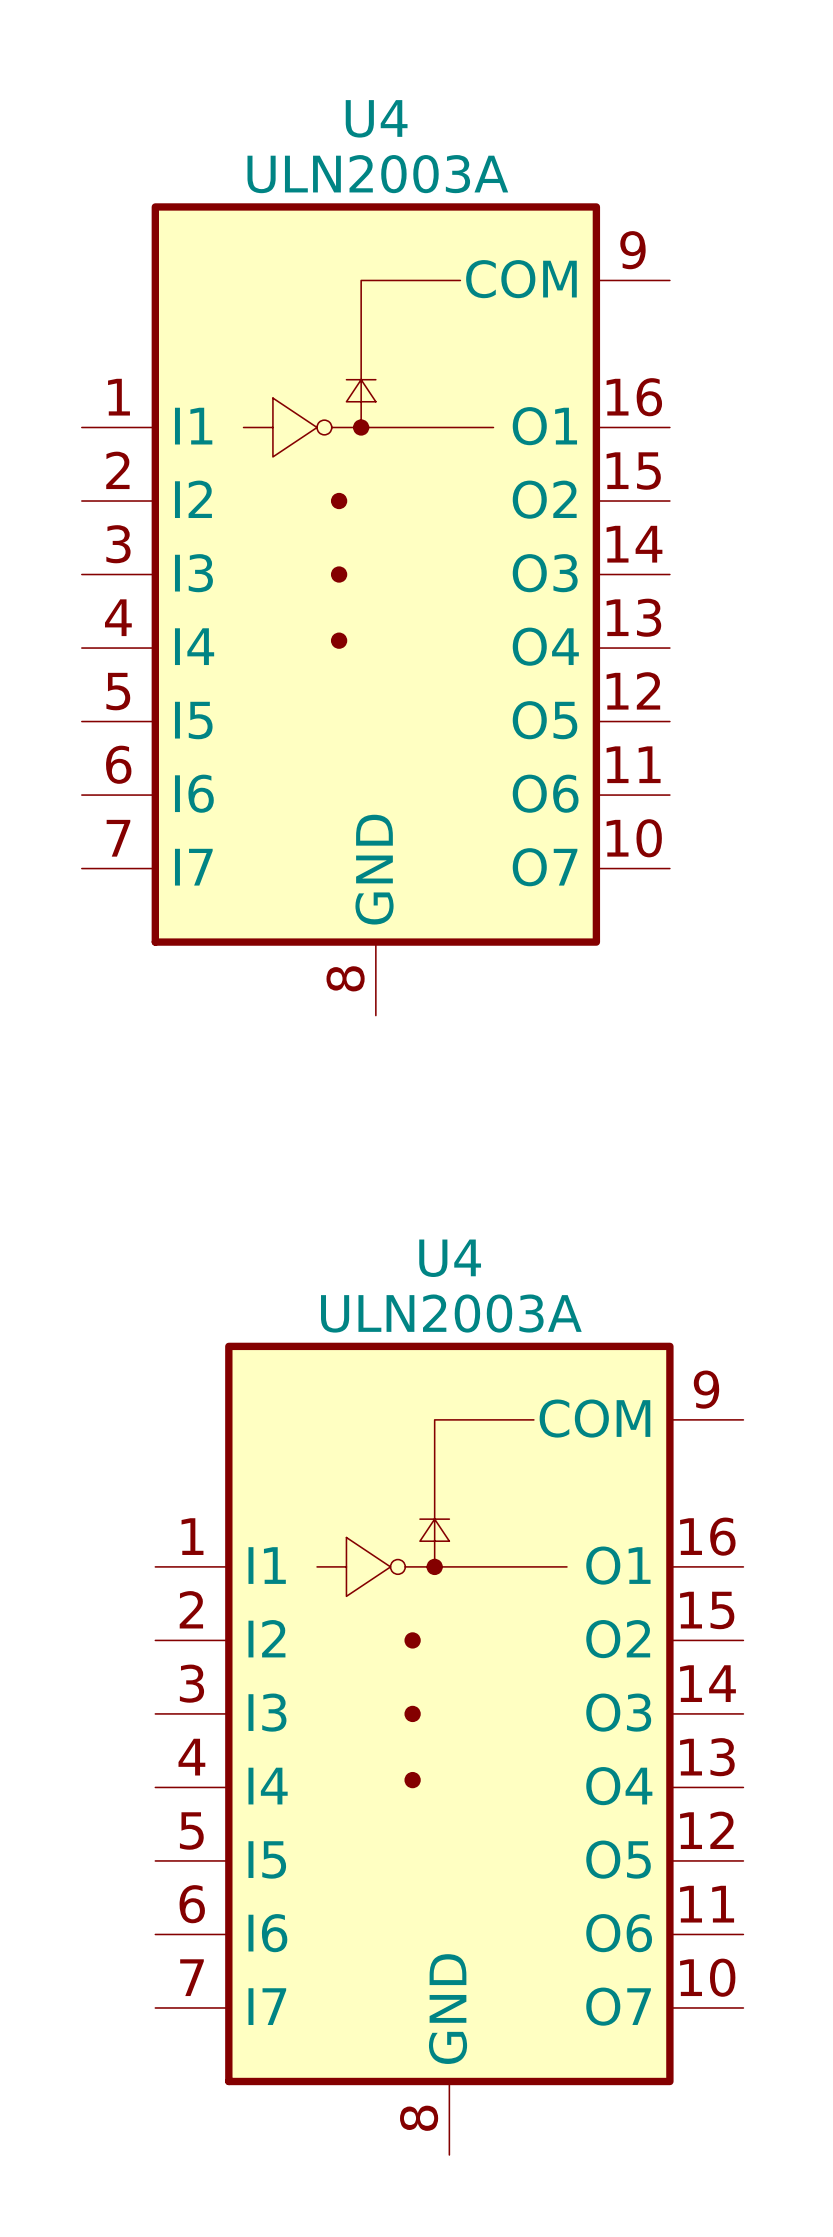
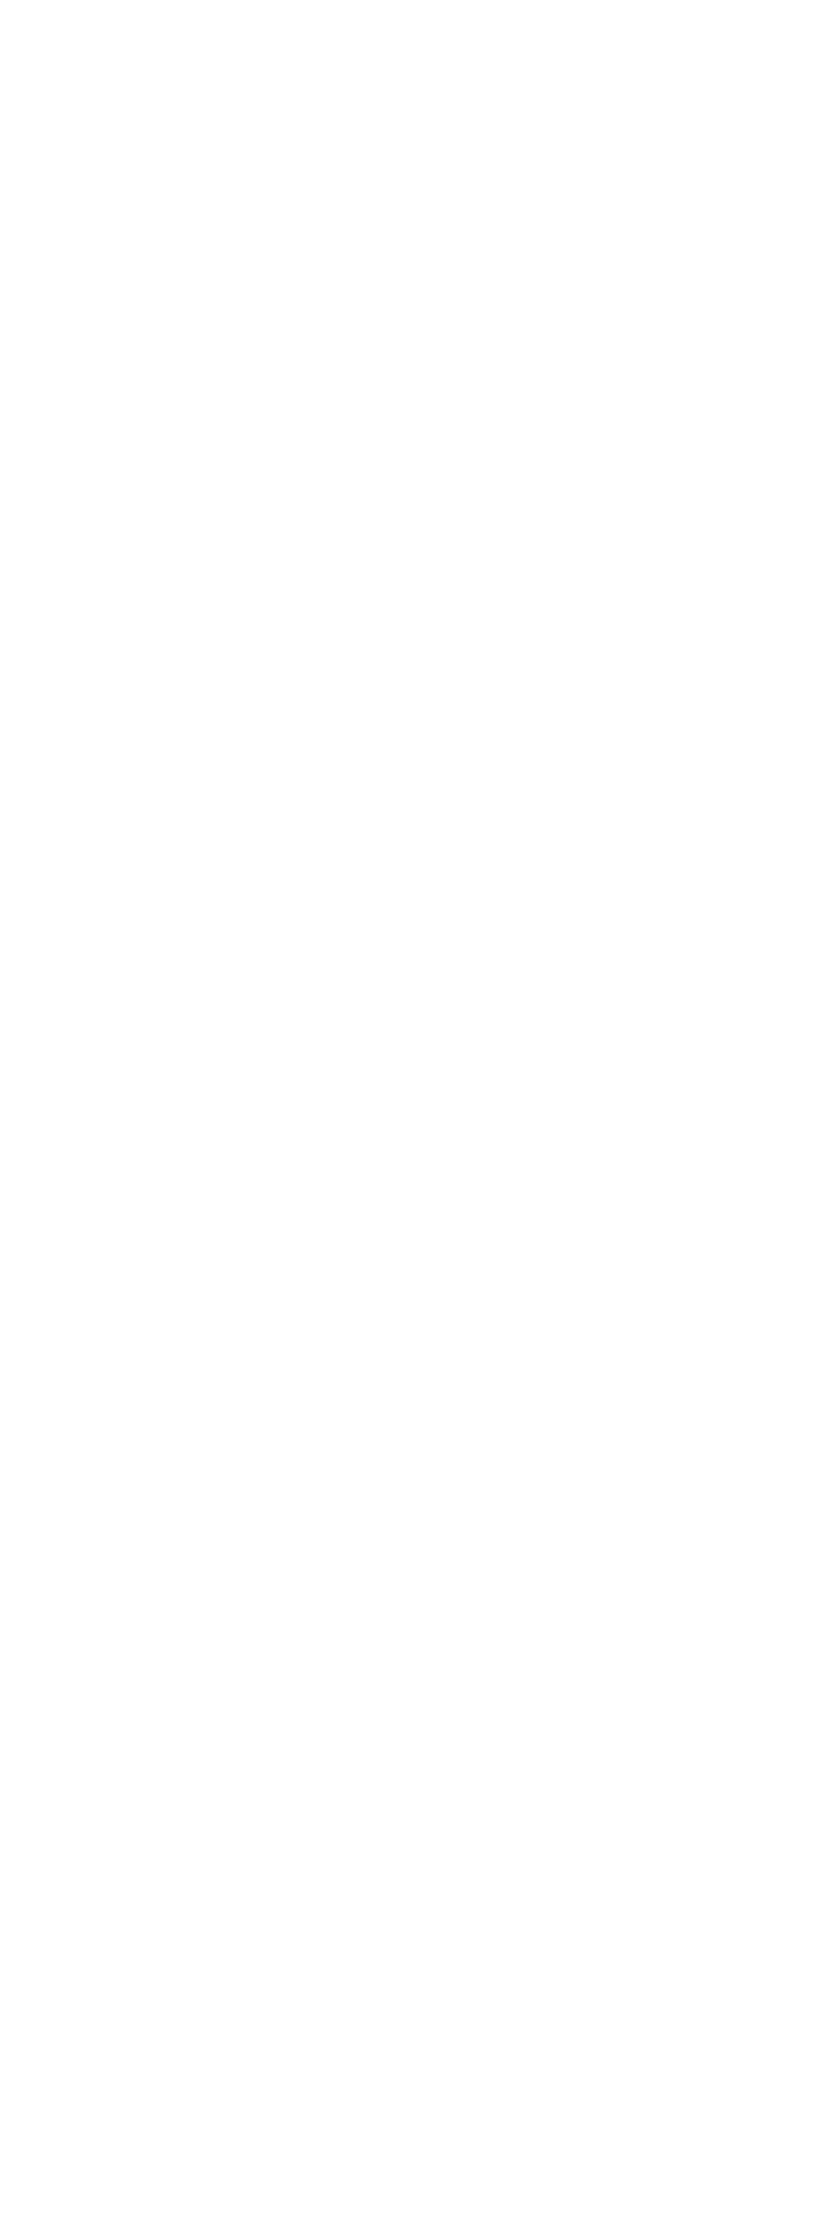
U4: ULN2003A (375, 609) -> none
U4: ULN2003A (449, 1748) -> none

